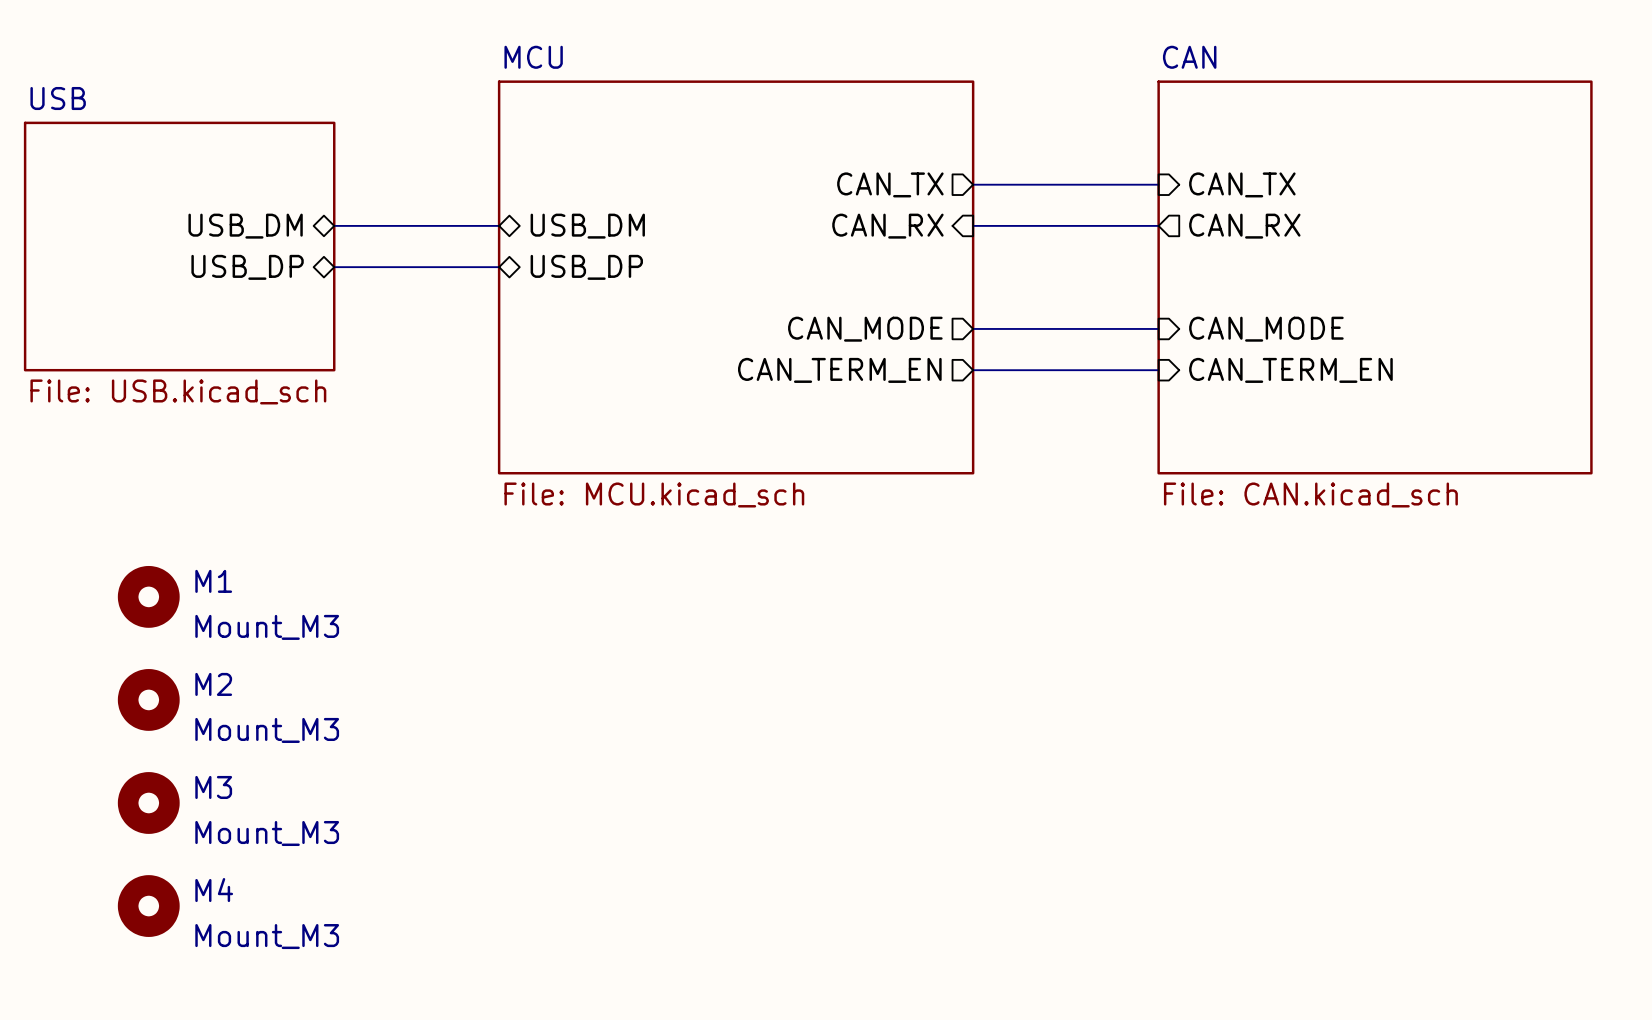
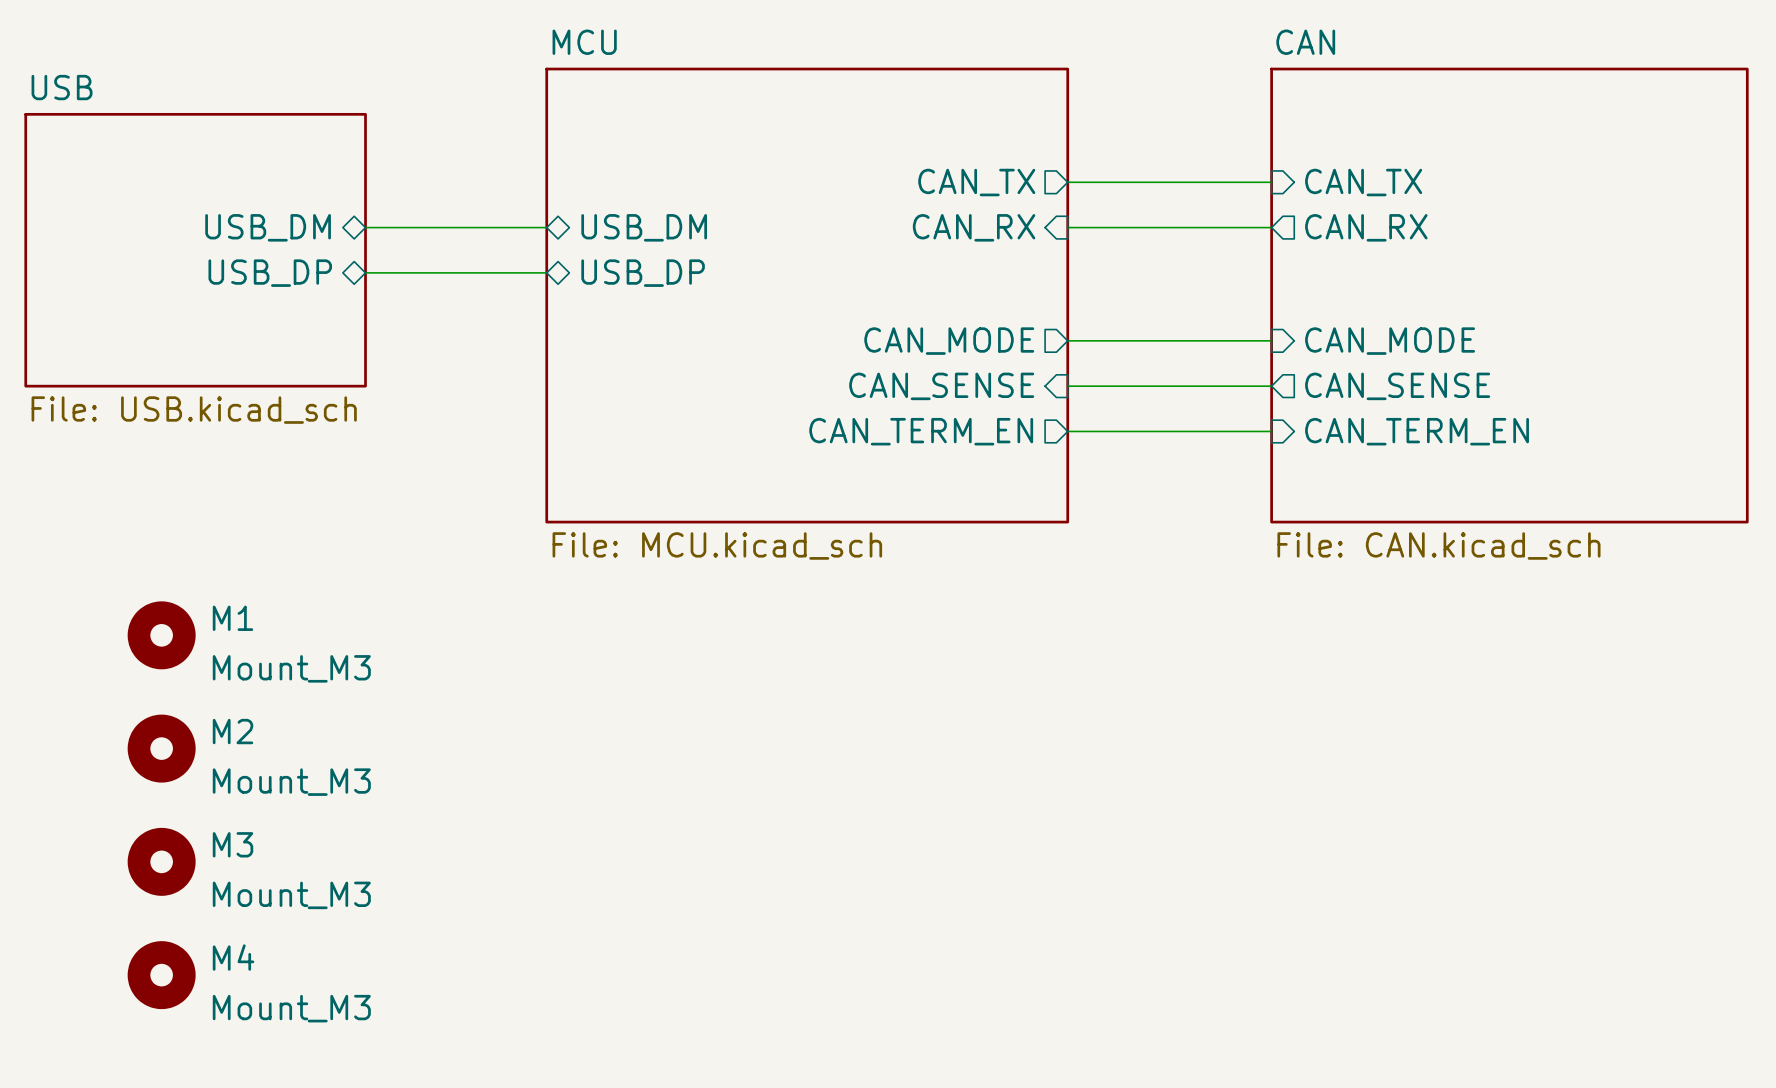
sheet MCU shape: [497, 80, 975, 475] -> [545, 67, 1070, 524]
sheet CAN shape: [1157, 80, 1593, 475] -> [1270, 67, 1749, 524]
sheet pin shape: output (839, 370) -> input (941, 386)
sheet pin: CAN_TERM_EN (839, 370) -> CAN_SENSE (941, 386)
sheet pin shape: input (1290, 370) -> output (1397, 386)
sheet pin: CAN_TERM_EN (1290, 370) -> CAN_SENSE (1397, 386)
sheet pin: none -> CAN_TERM_EN (921, 431)
wire: none -> (1067, 431) (1271, 431)
sheet pin: none -> CAN_TERM_EN (1417, 431)

